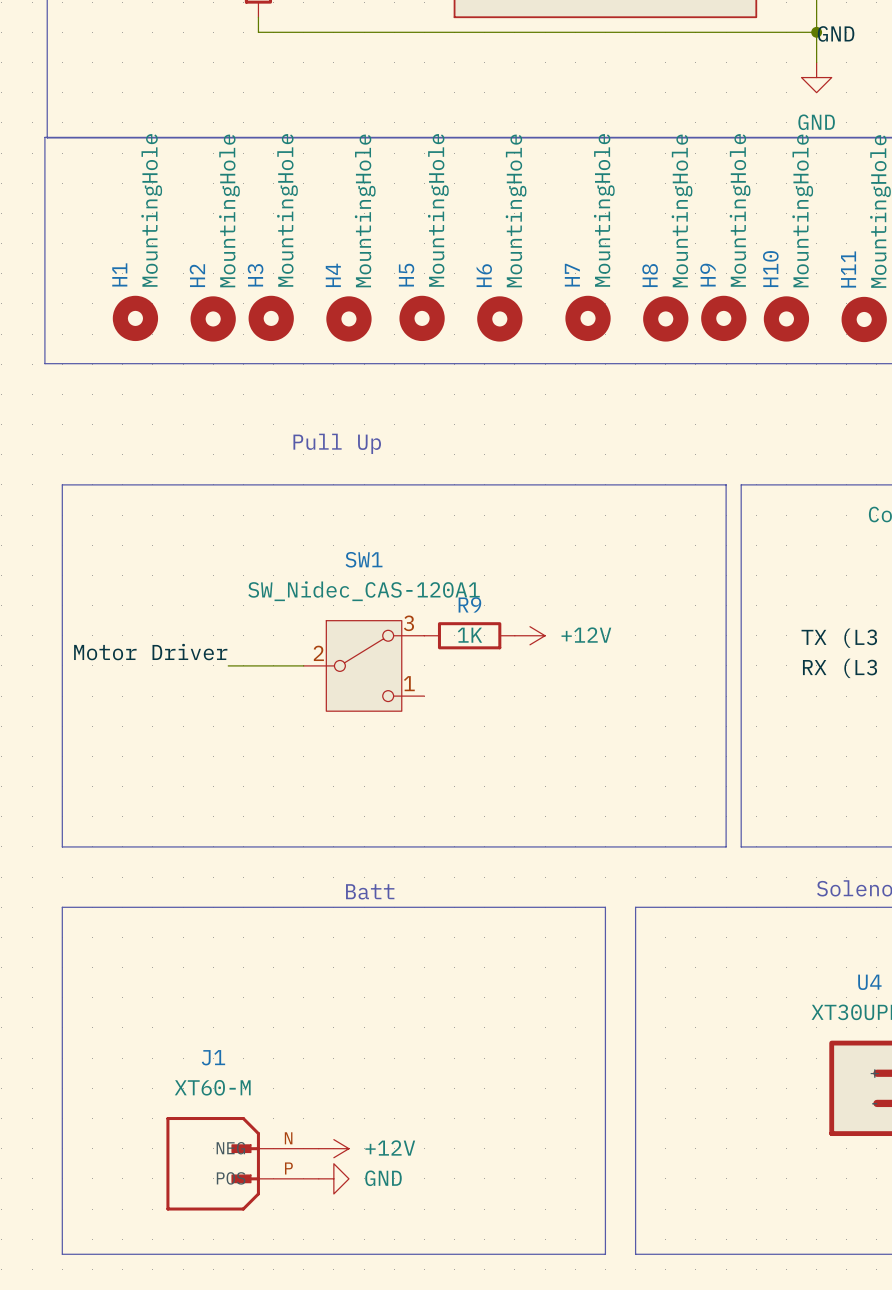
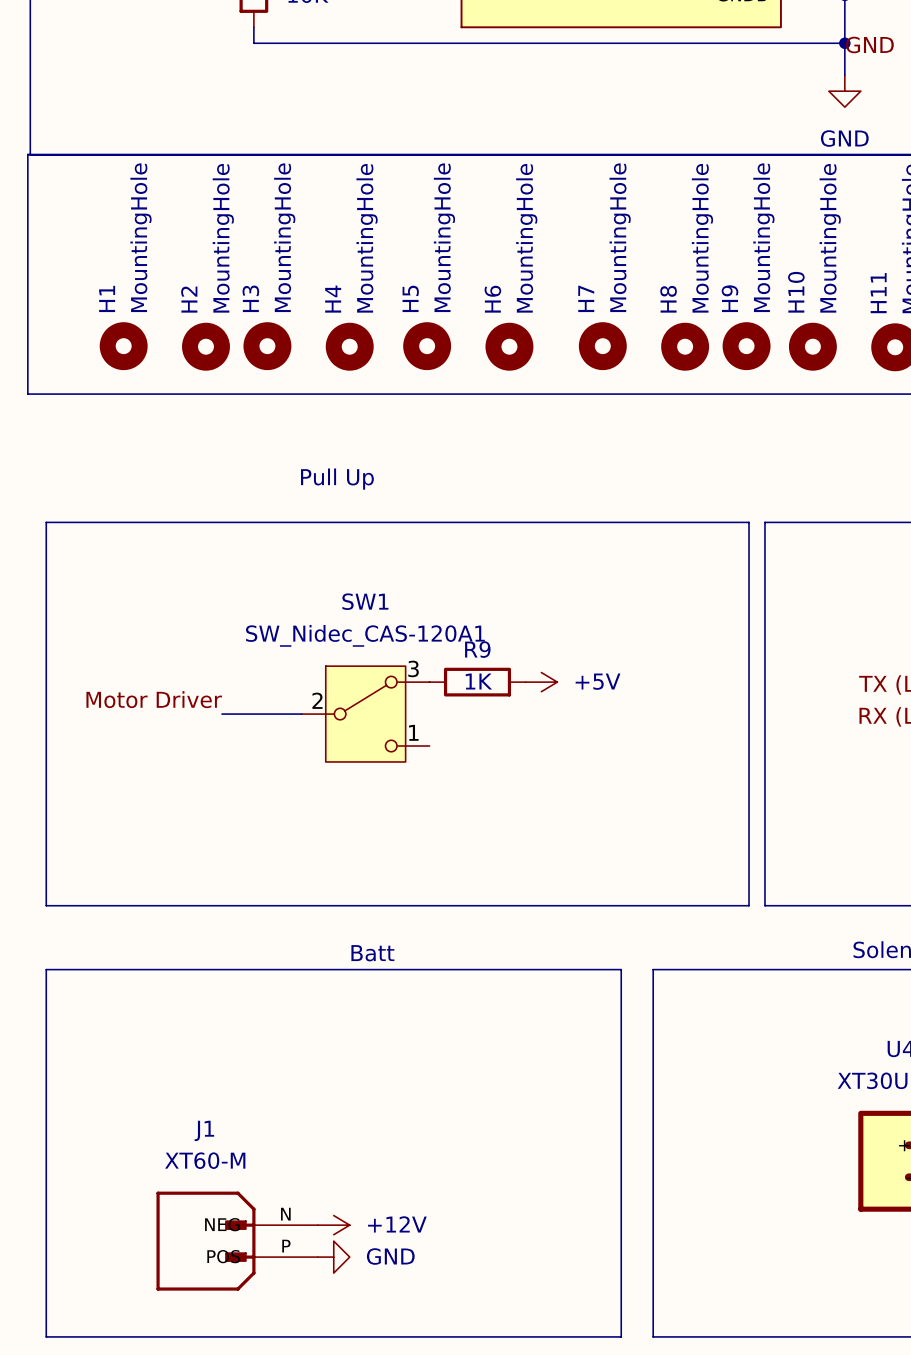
power symbol: +12V (529, 635) -> +5V (541, 682)

